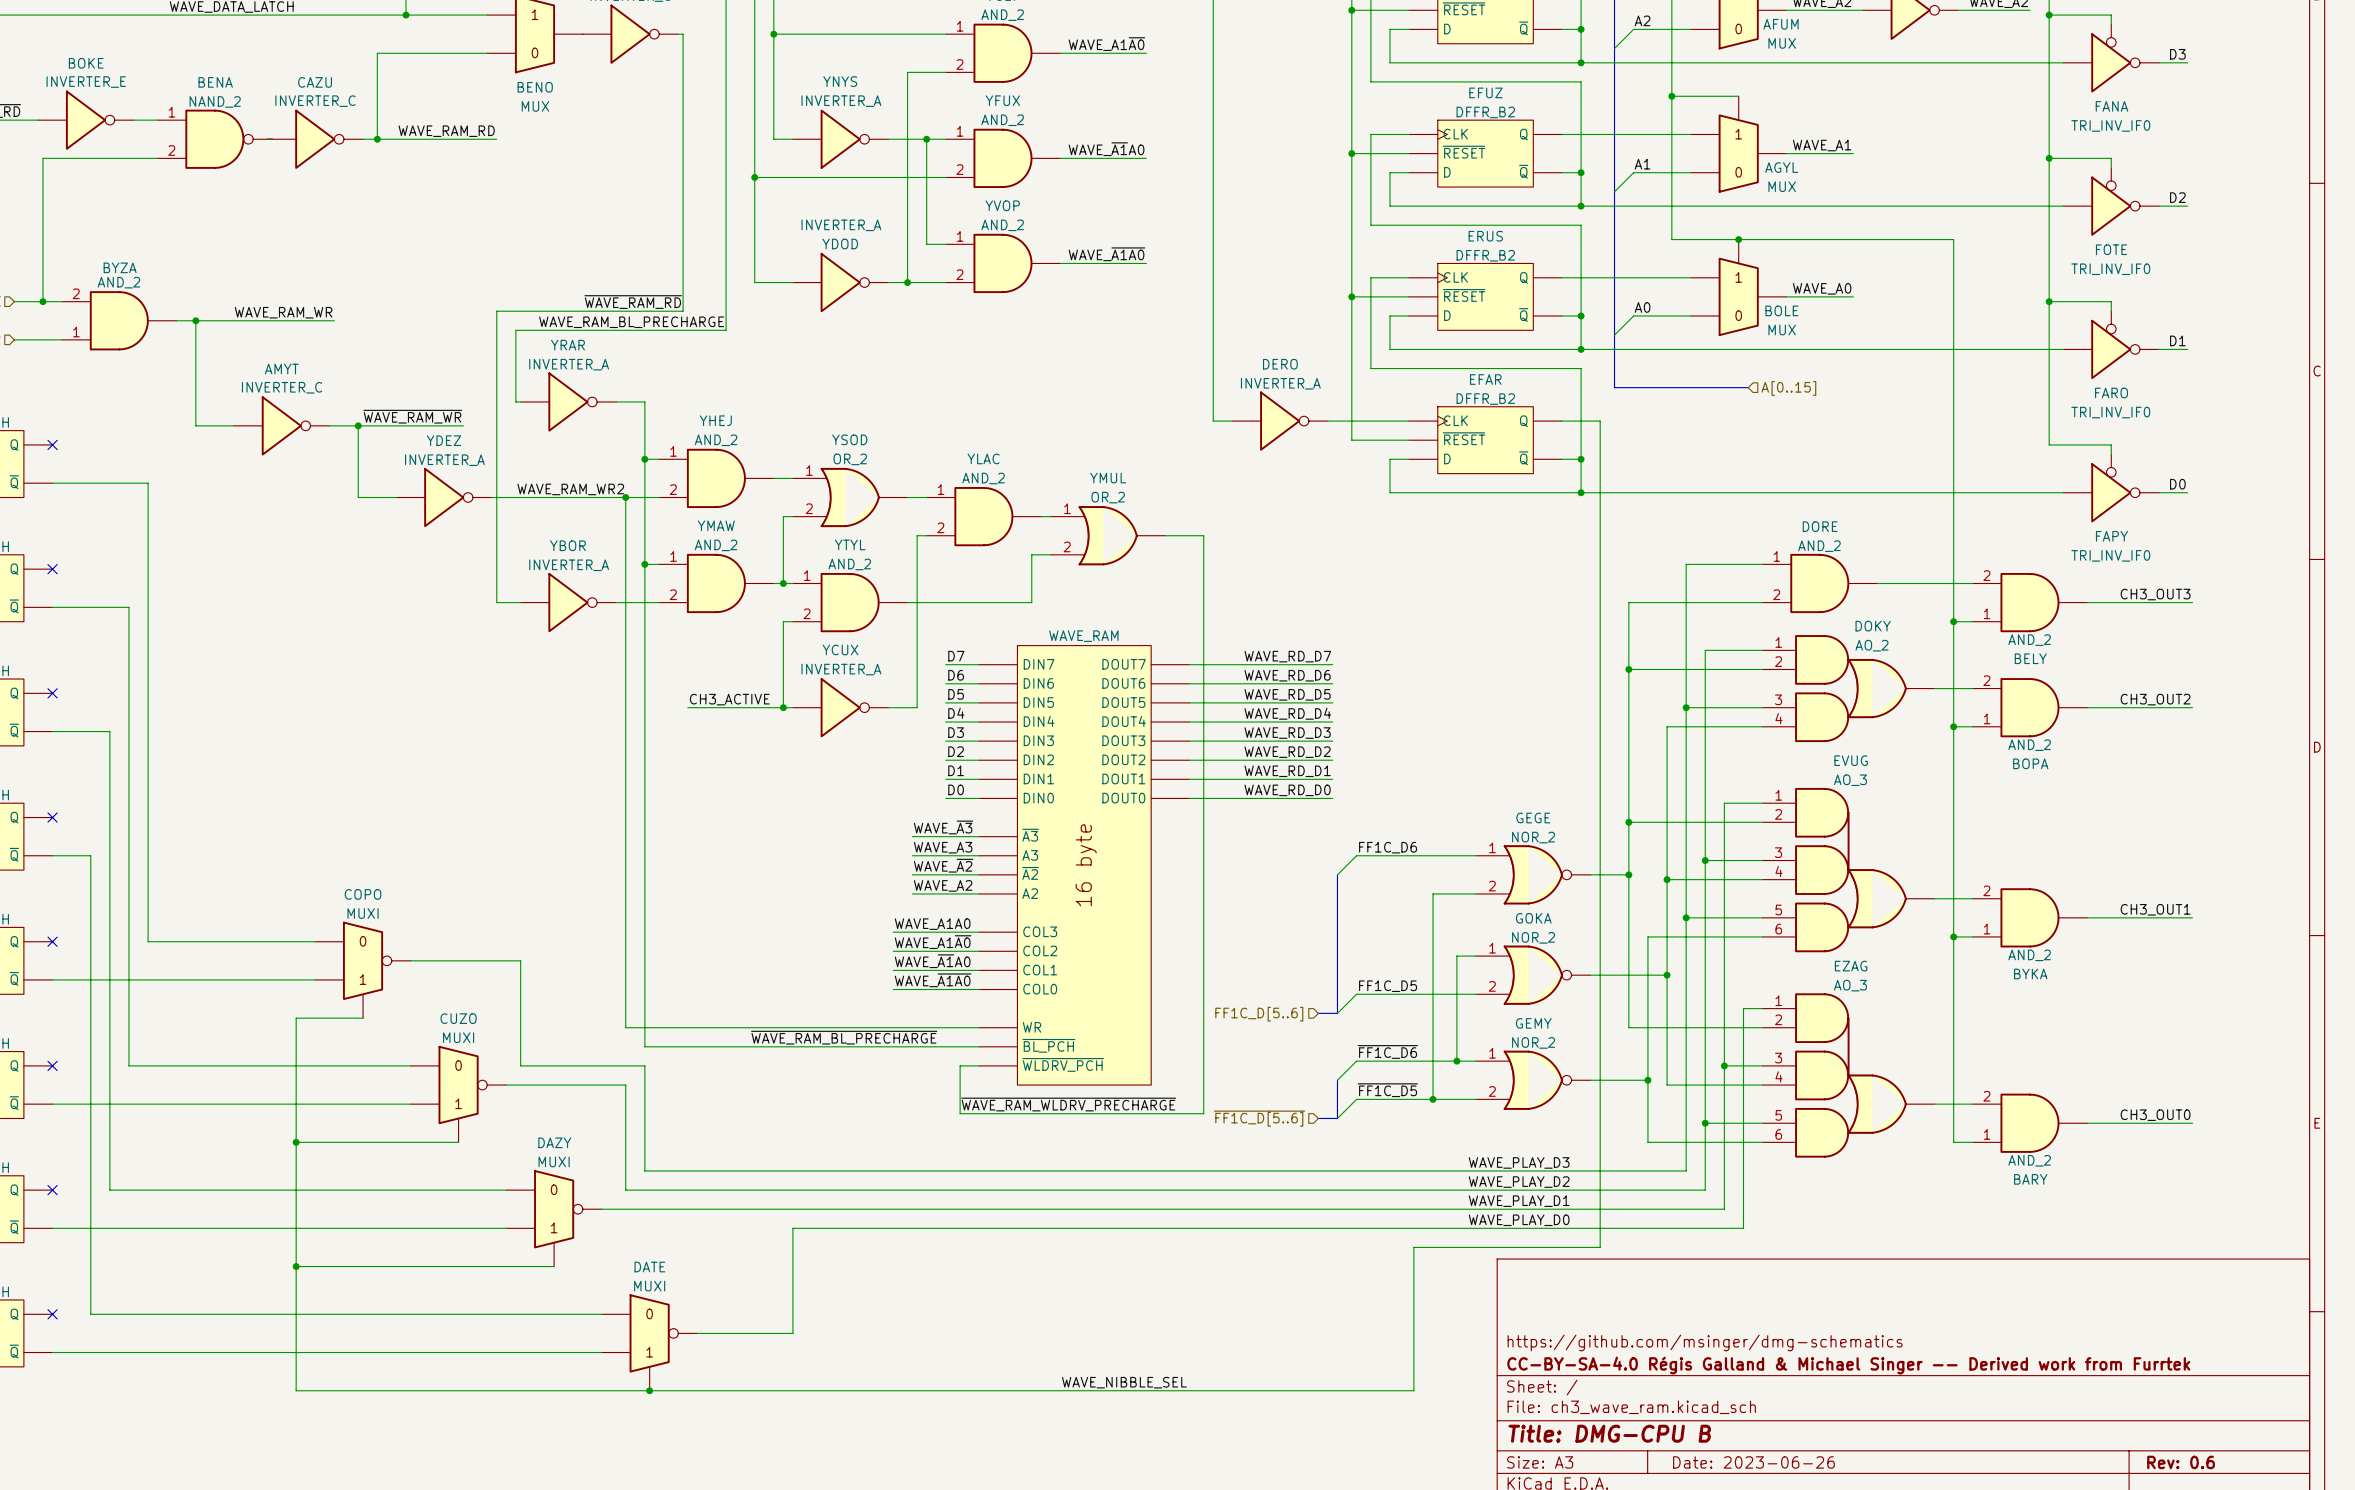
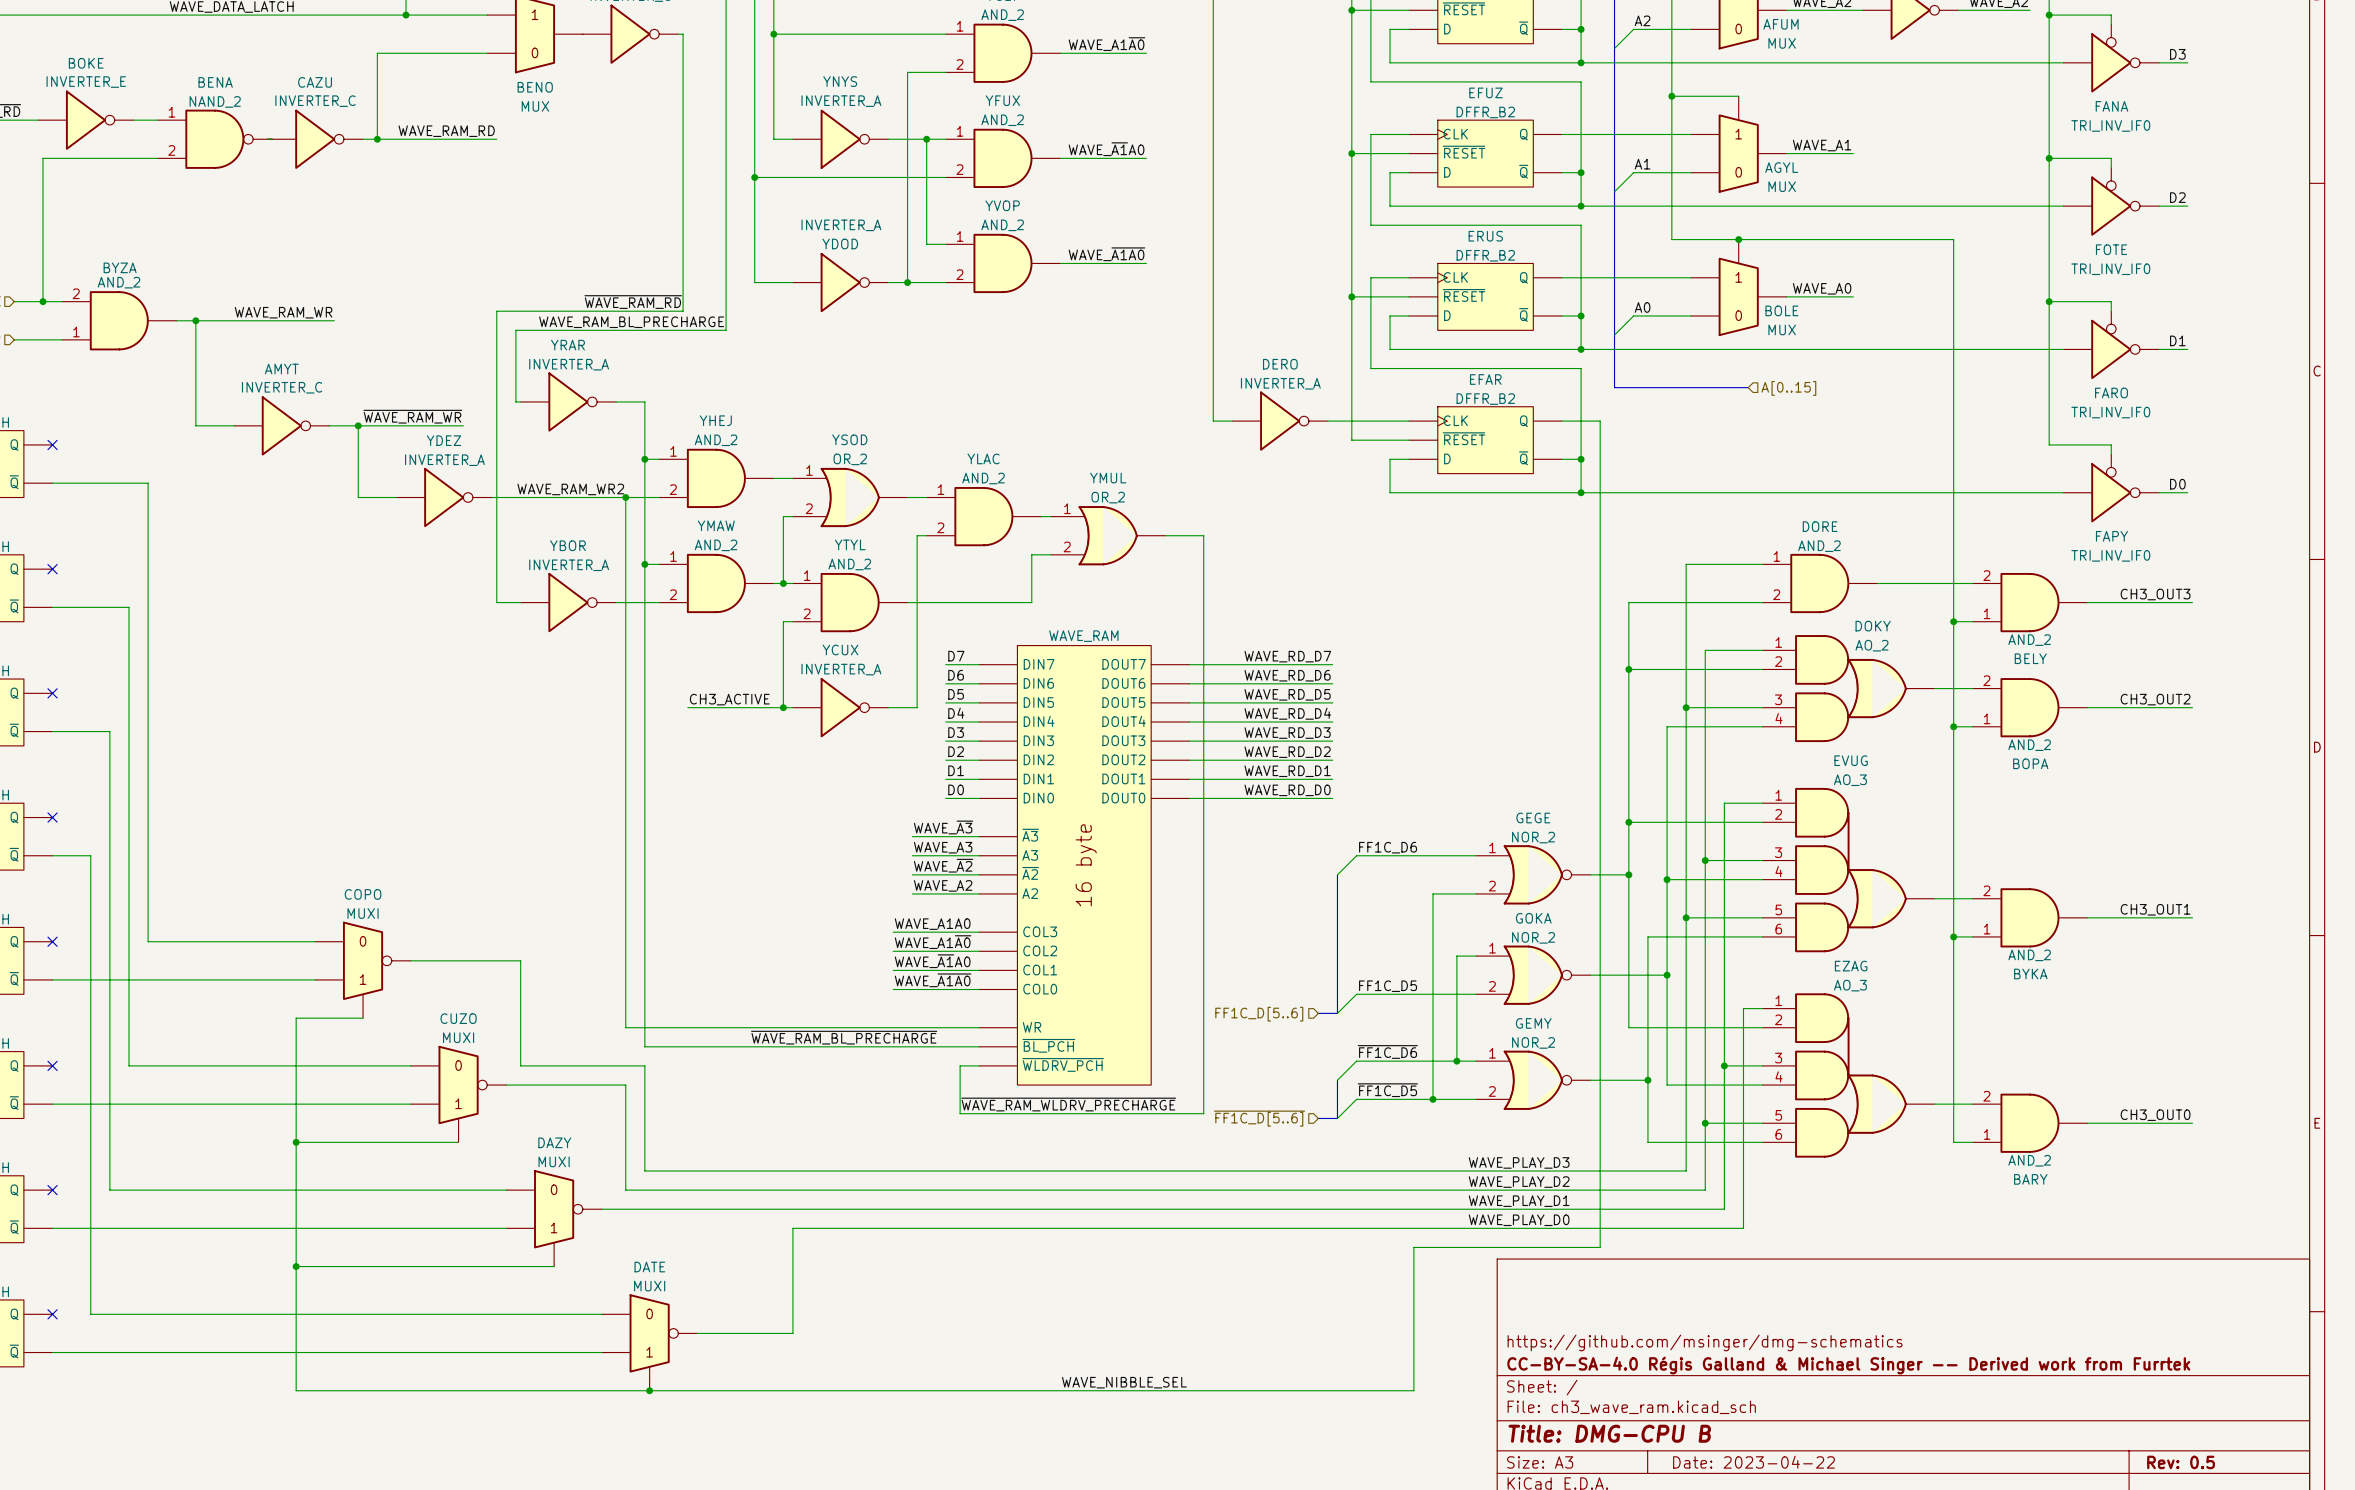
title block: Date: 2023-06-26 (1753, 1462) -> Date: 2023-04-22 (1753, 1462)
title block: Rev: 0.6 (2181, 1462) -> Rev: 0.5 (2181, 1462)

